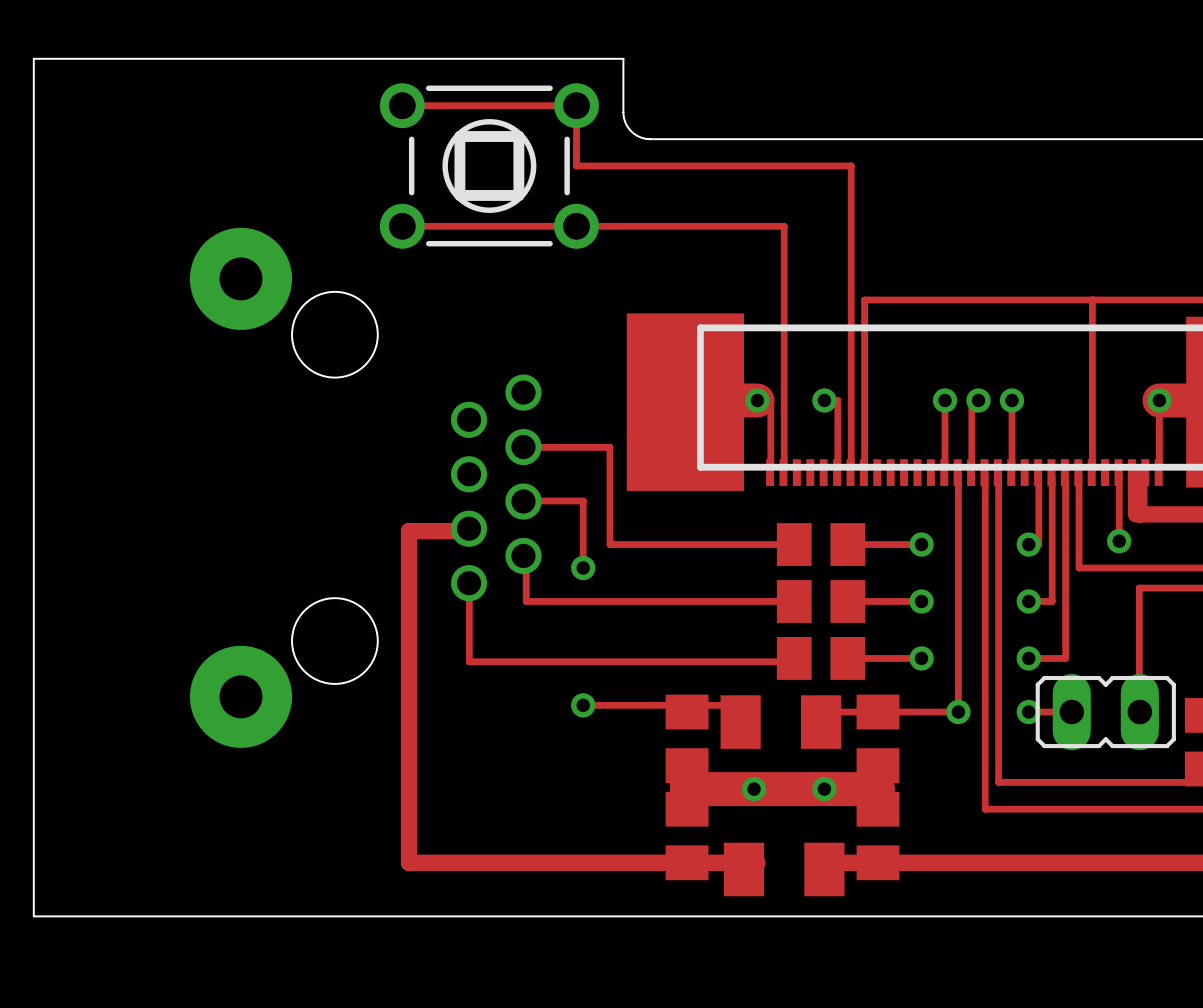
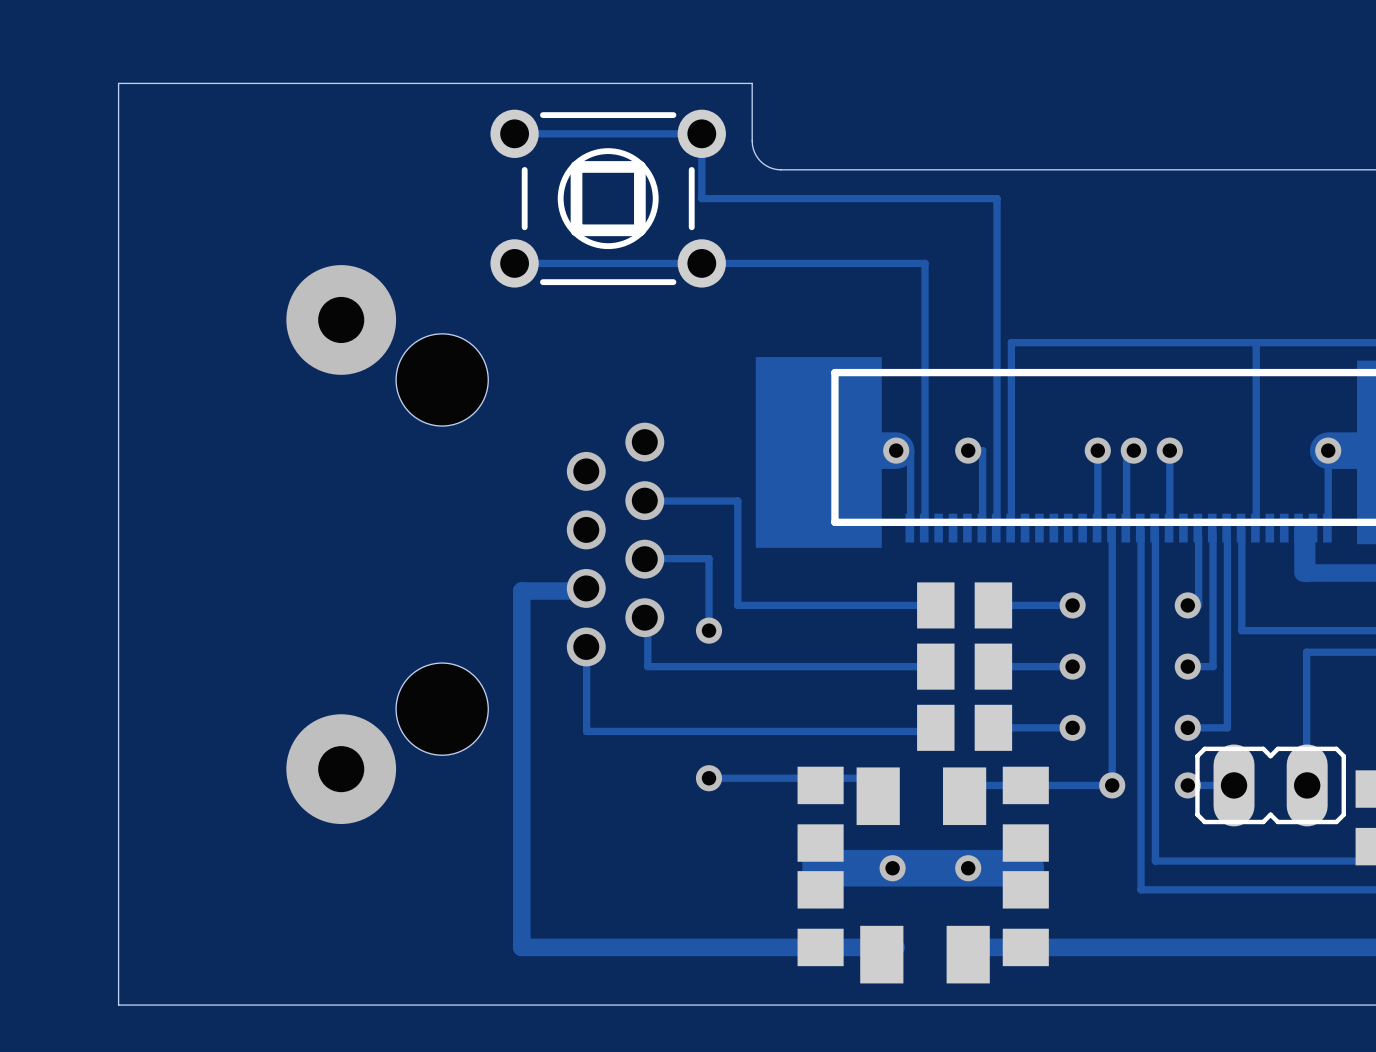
track: (1119, 470) (1119, 541) -> none
via: (1119, 541) -> none

